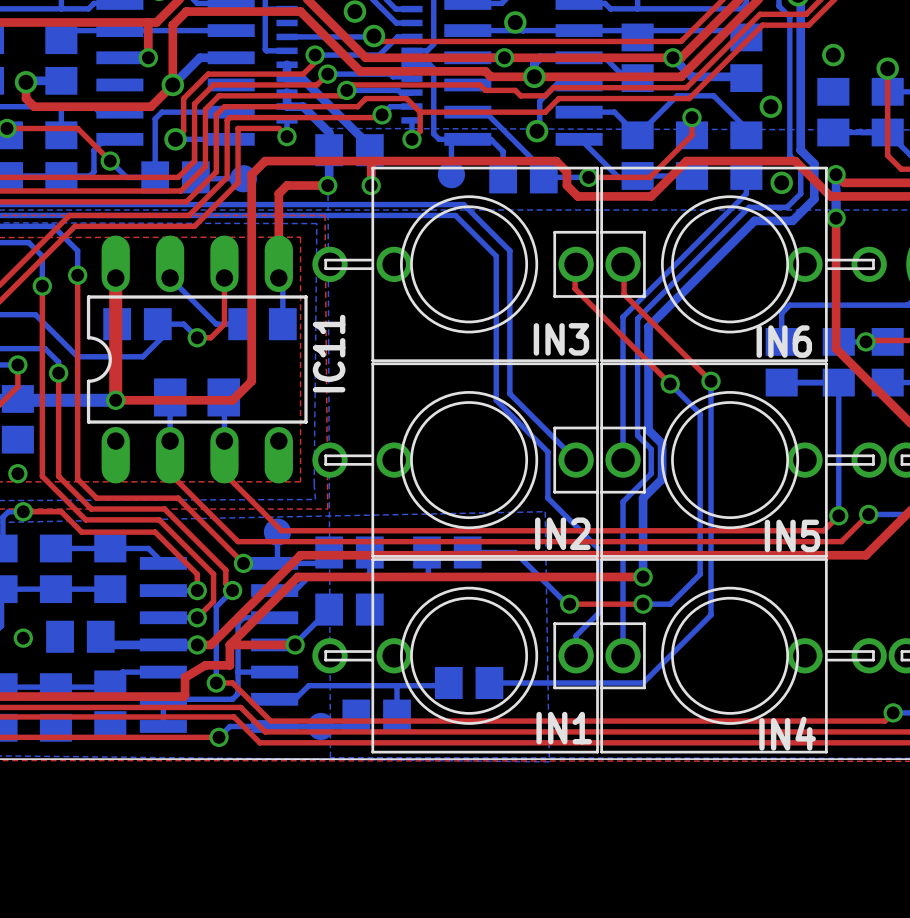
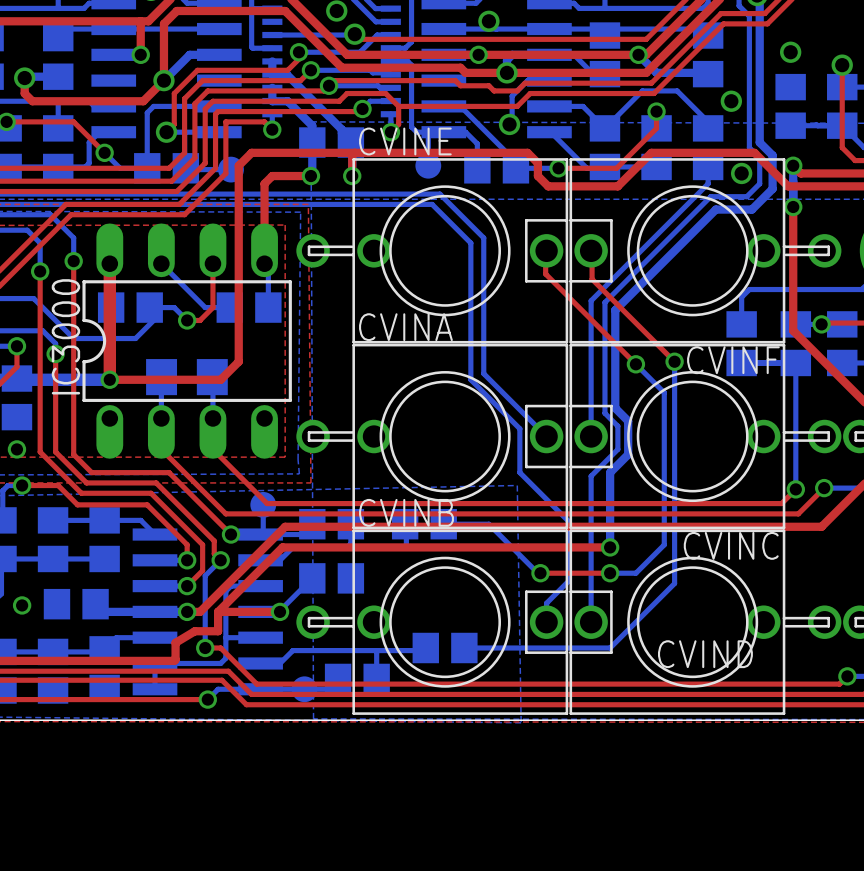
IN3 name: IN3 (561, 339) -> CVINE (405, 141)
IN6 name: IN6 (784, 341) -> CVINF (733, 360)
IC11 name: IC11 (329, 353) -> IC3000 (65, 336)
IN2 name: IN2 (562, 533) -> CVINA (405, 327)
IN5 name: IN5 (792, 535) -> CVINC (731, 545)
IN1 name: IN1 (564, 728) -> CVINB (406, 512)
IN4 name: IN4 (787, 733) -> CVIND (705, 654)

